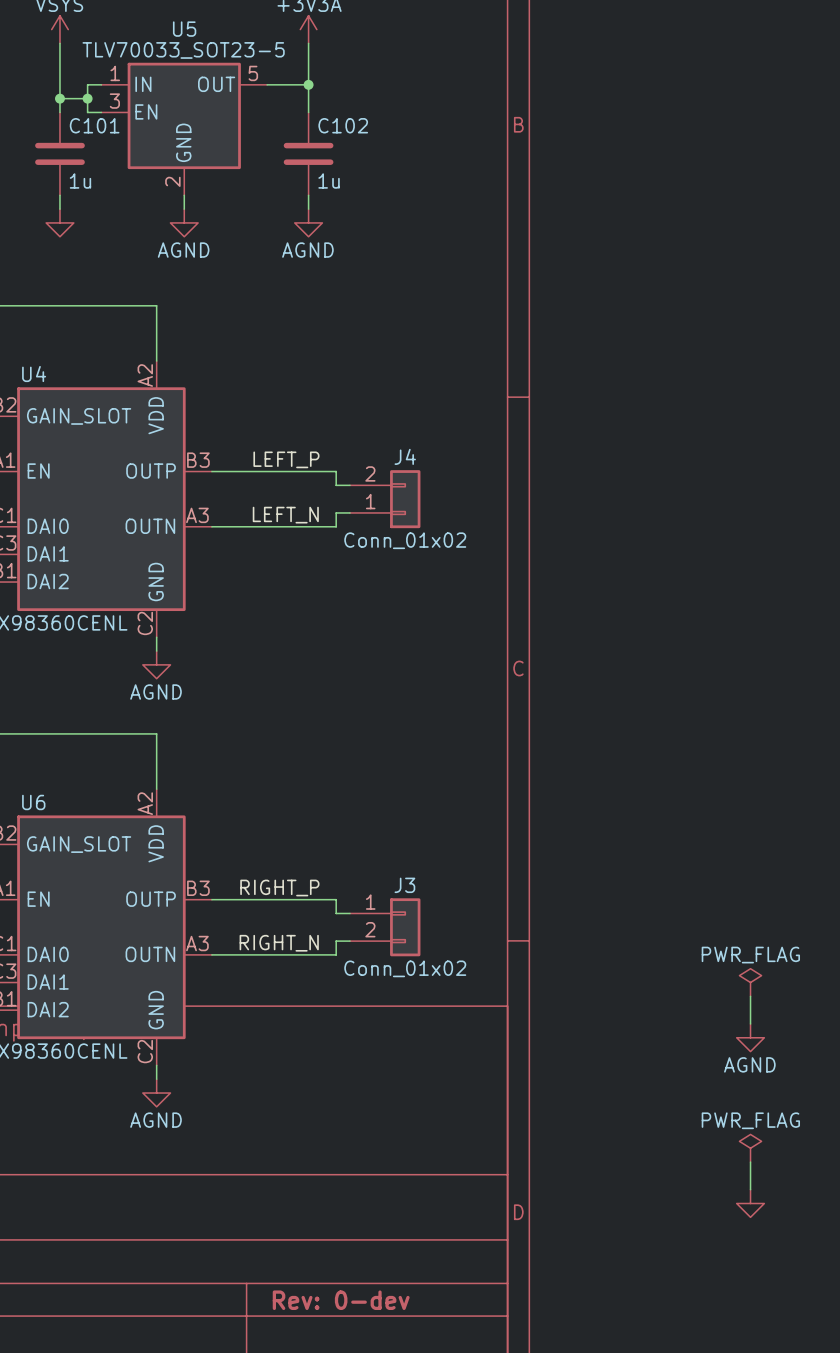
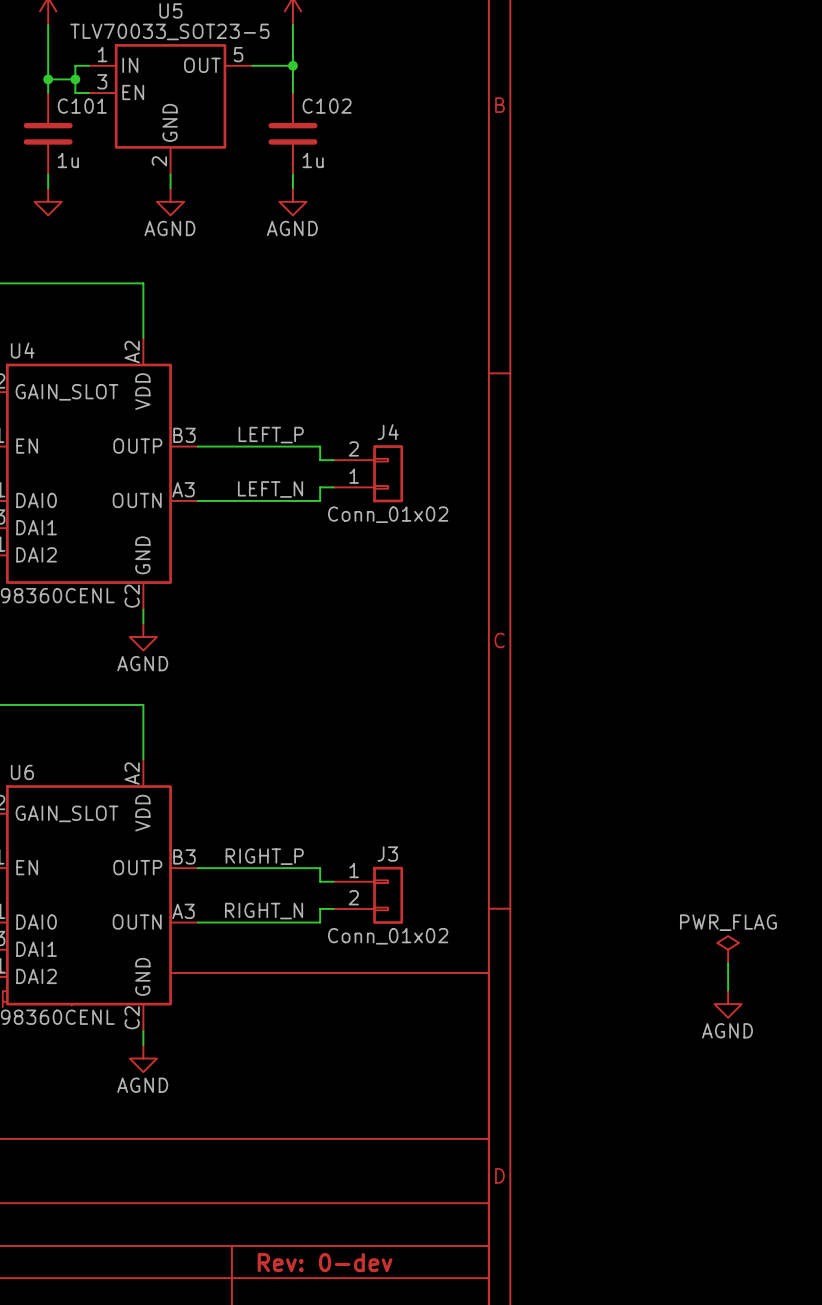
power symbol: PWR_FLAG (750, 1148) -> none
wire: (750, 1162) (750, 1189) -> none
power symbol: (750, 1203) -> none

